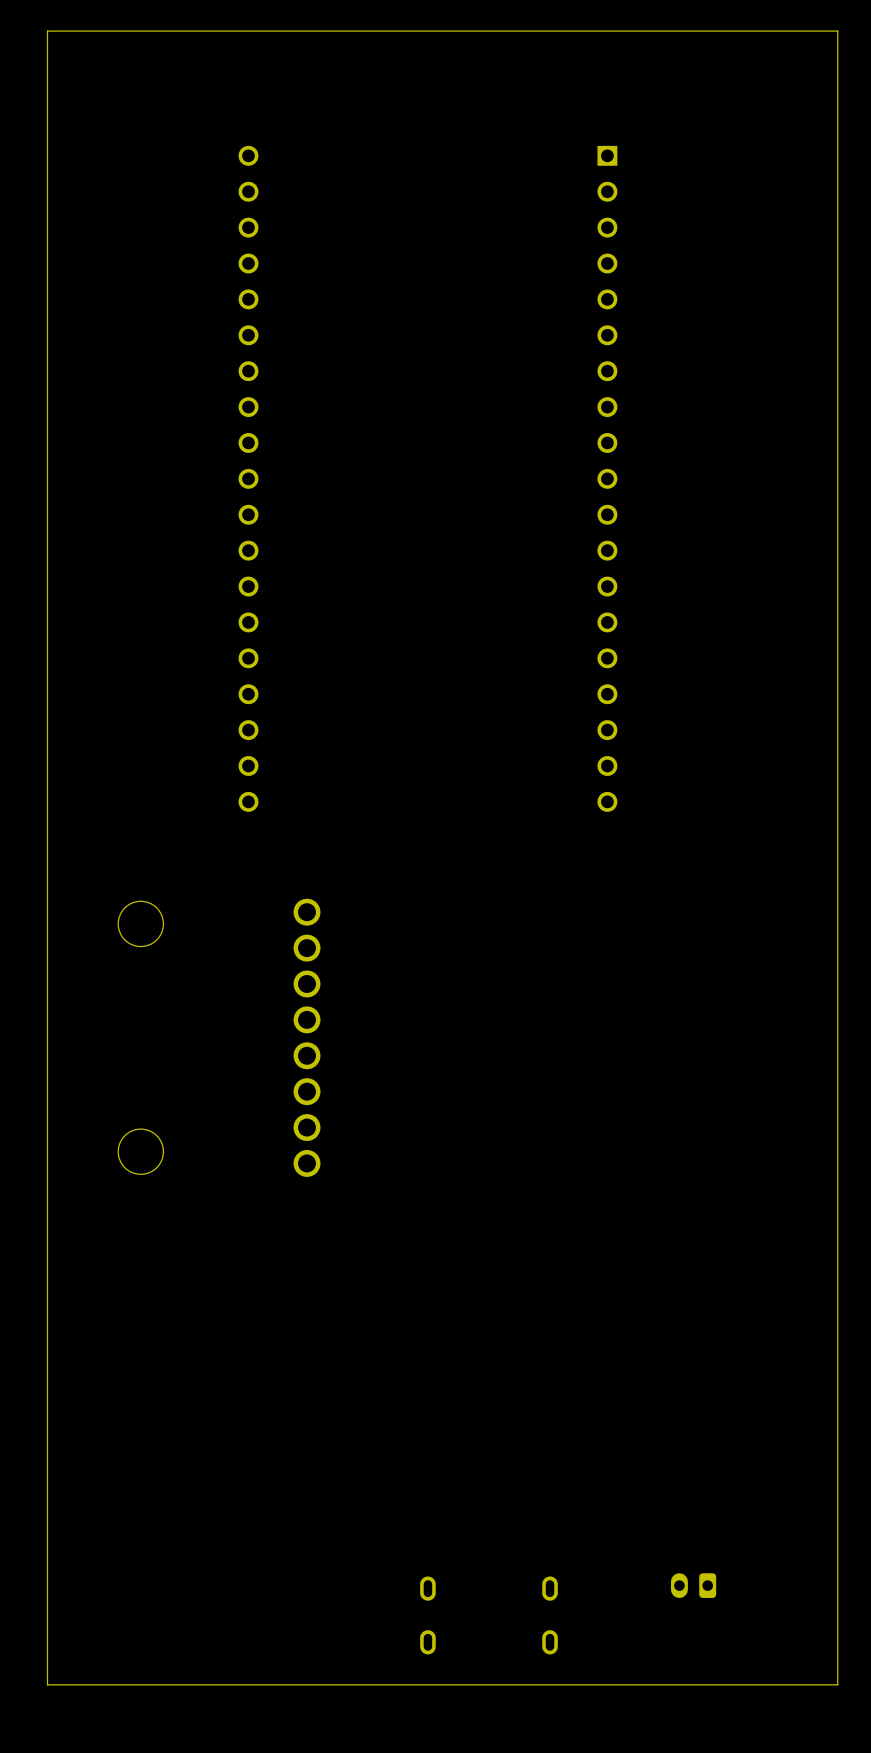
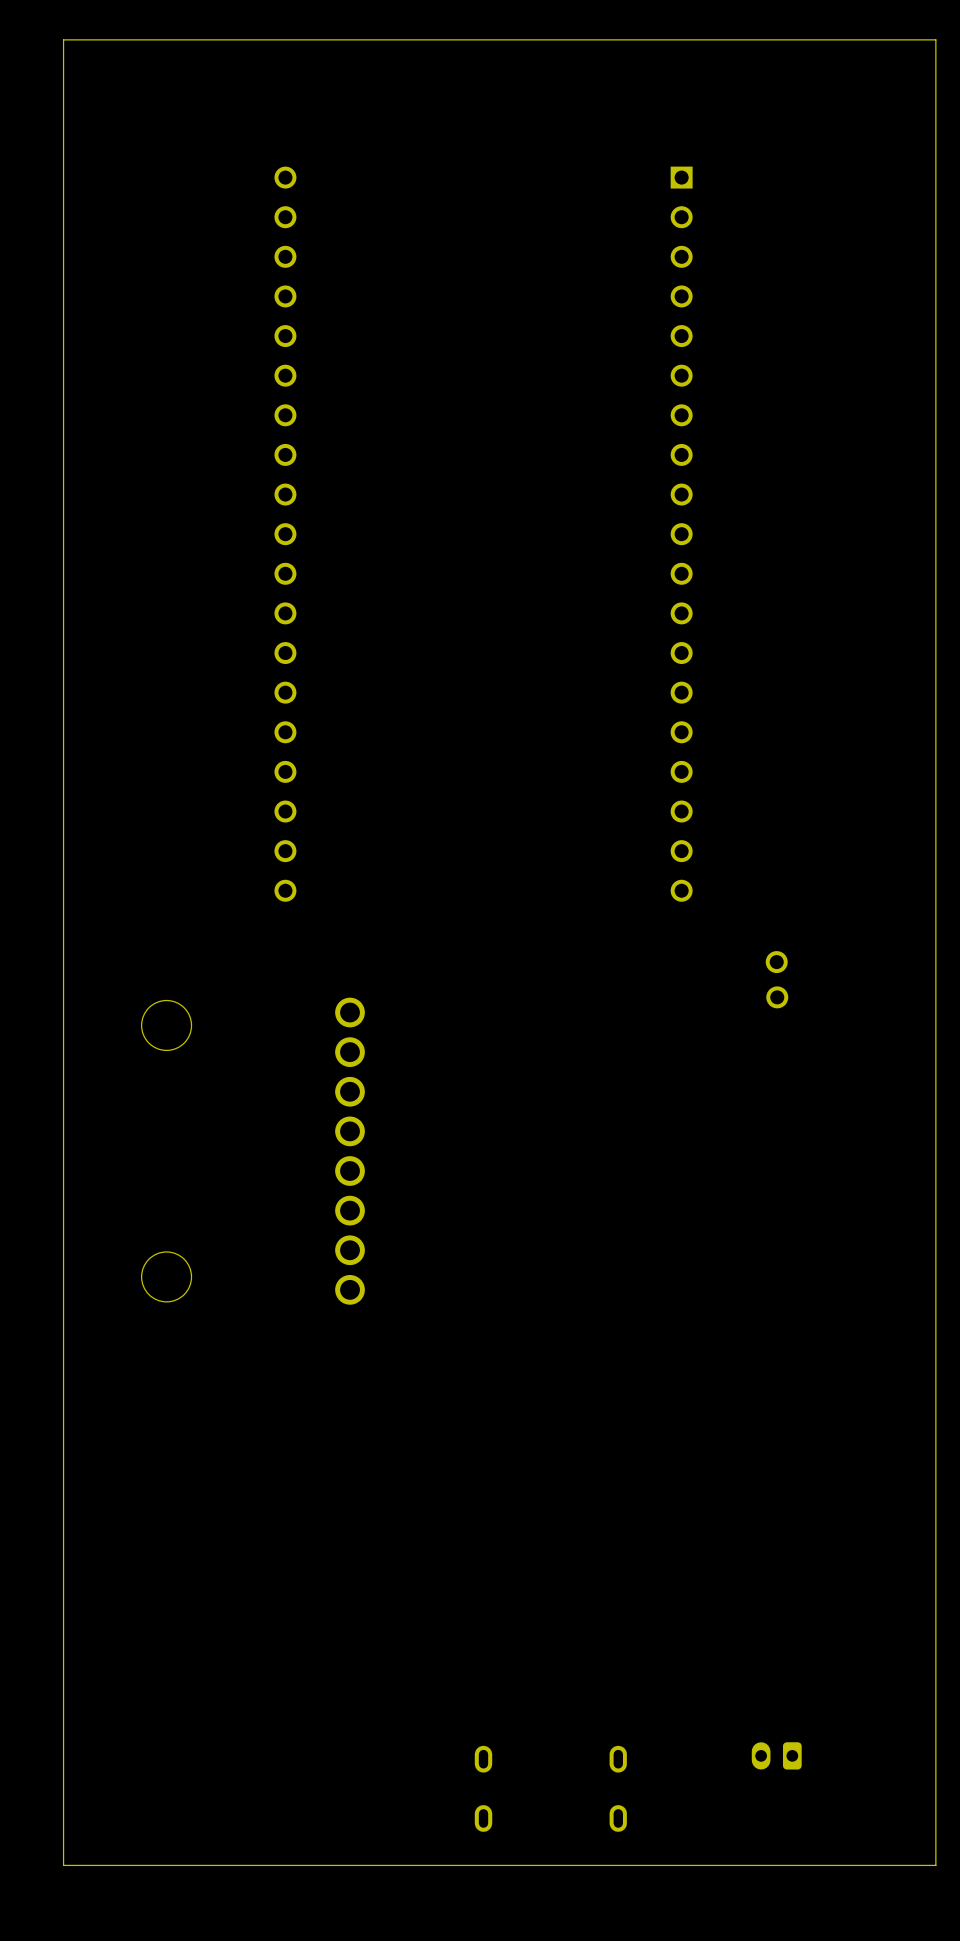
part: none -> (776, 962)
part: none -> (777, 997)

